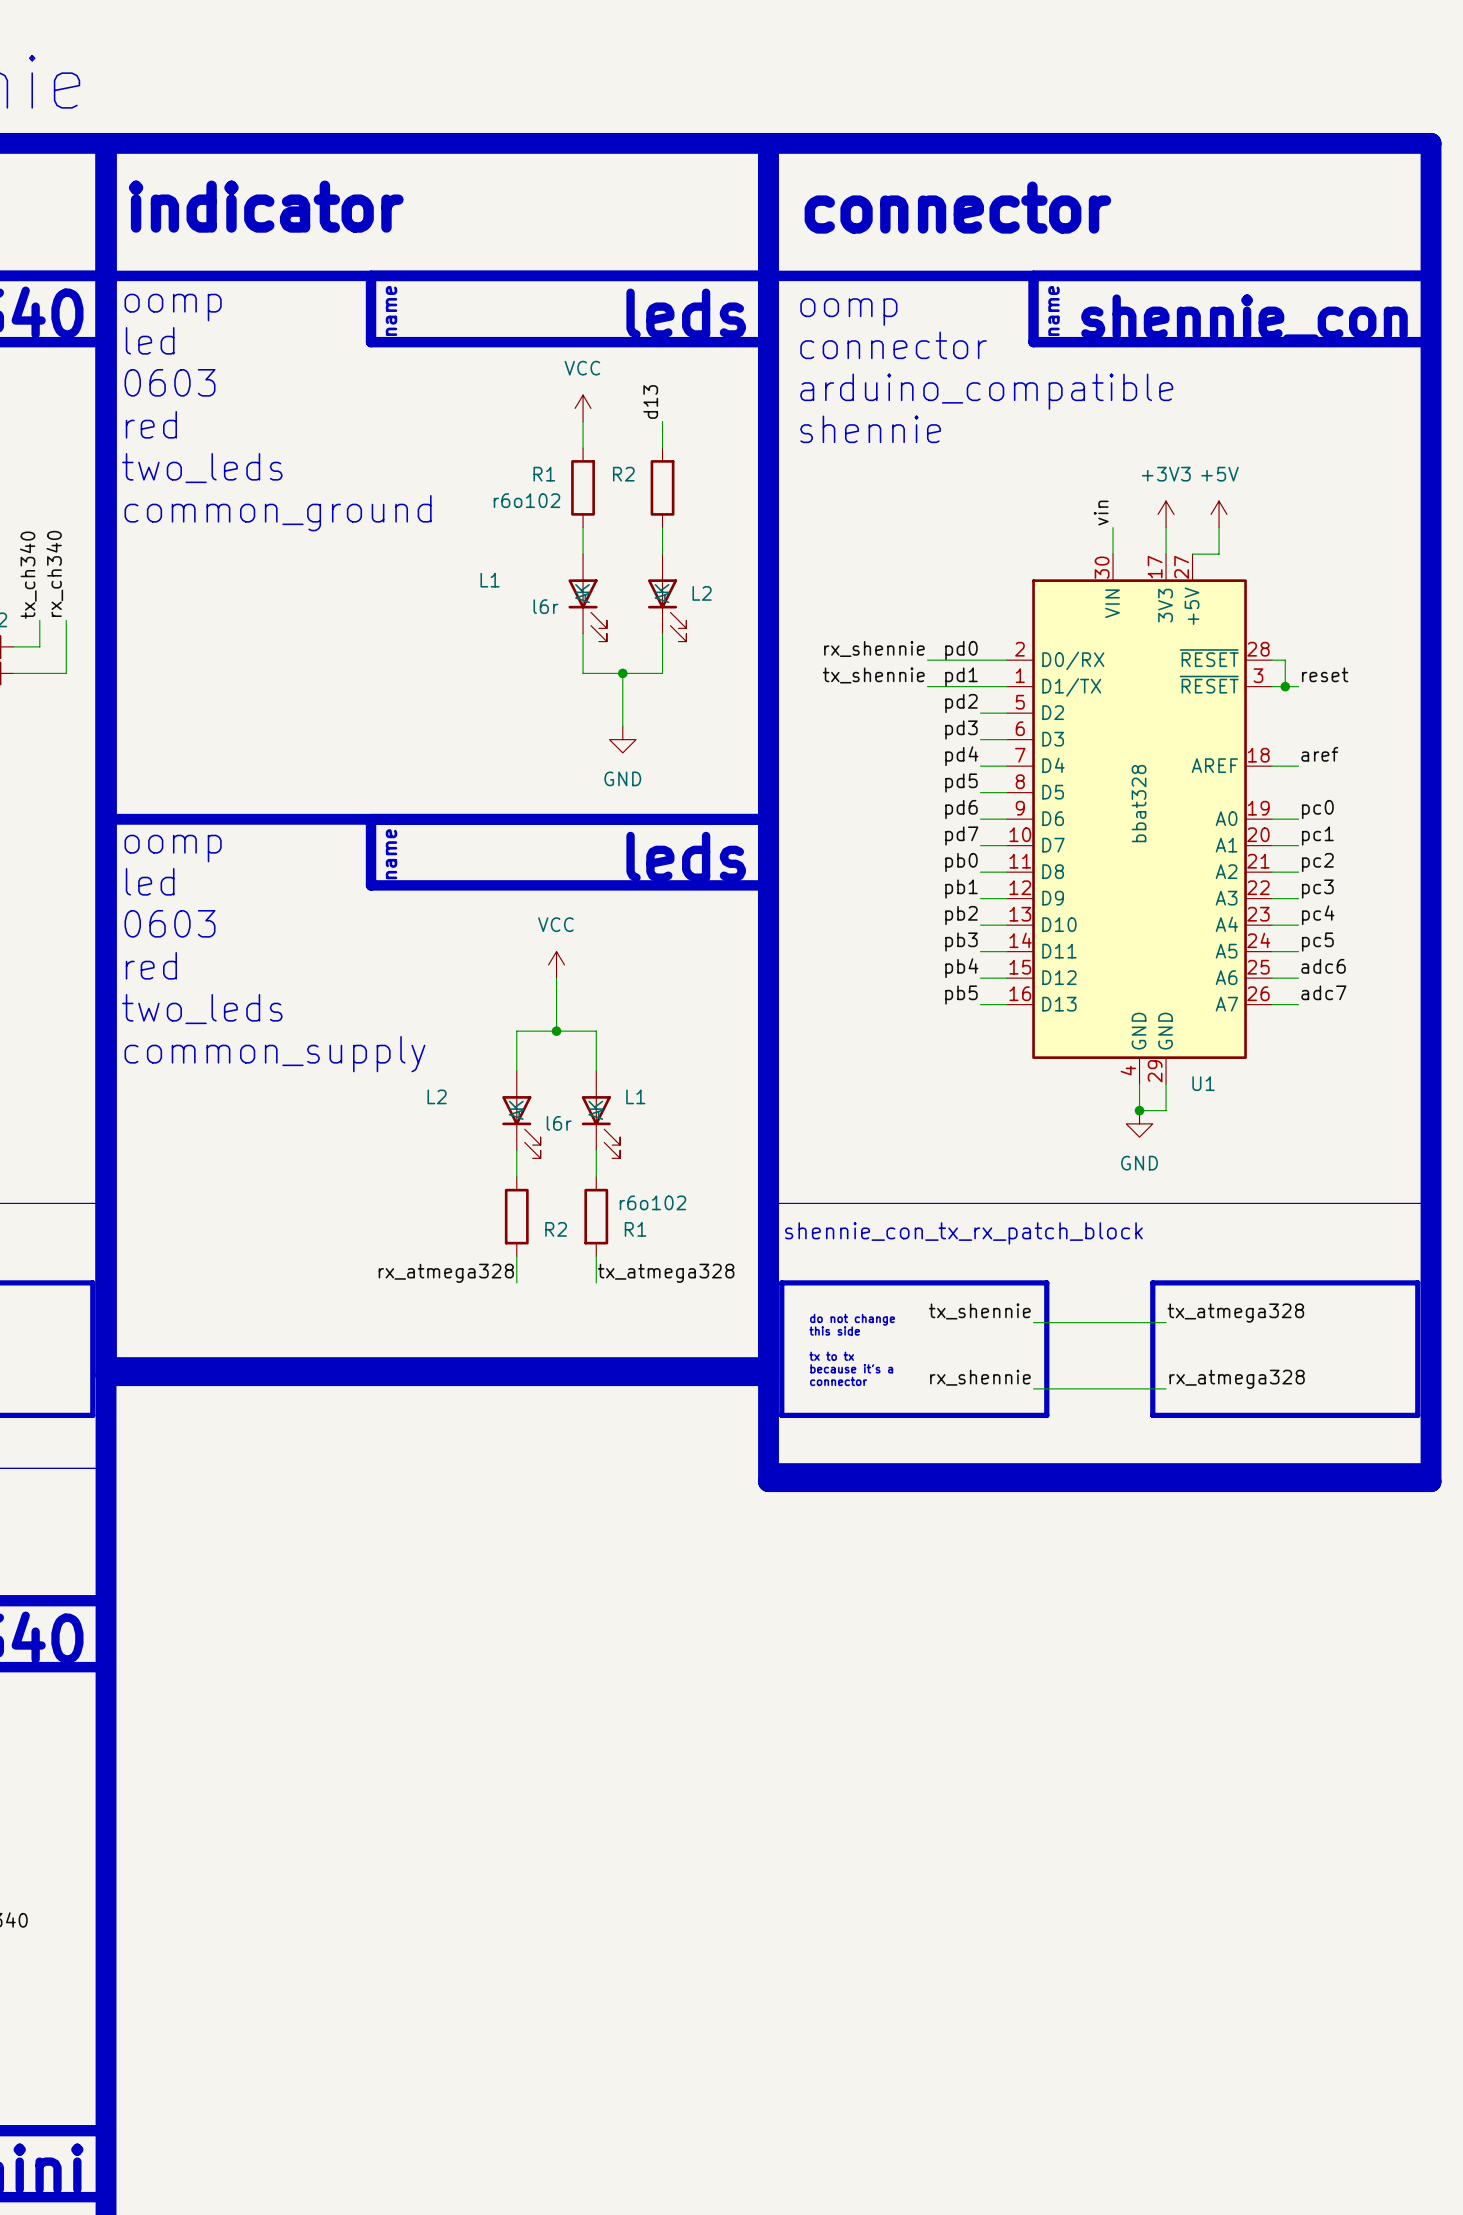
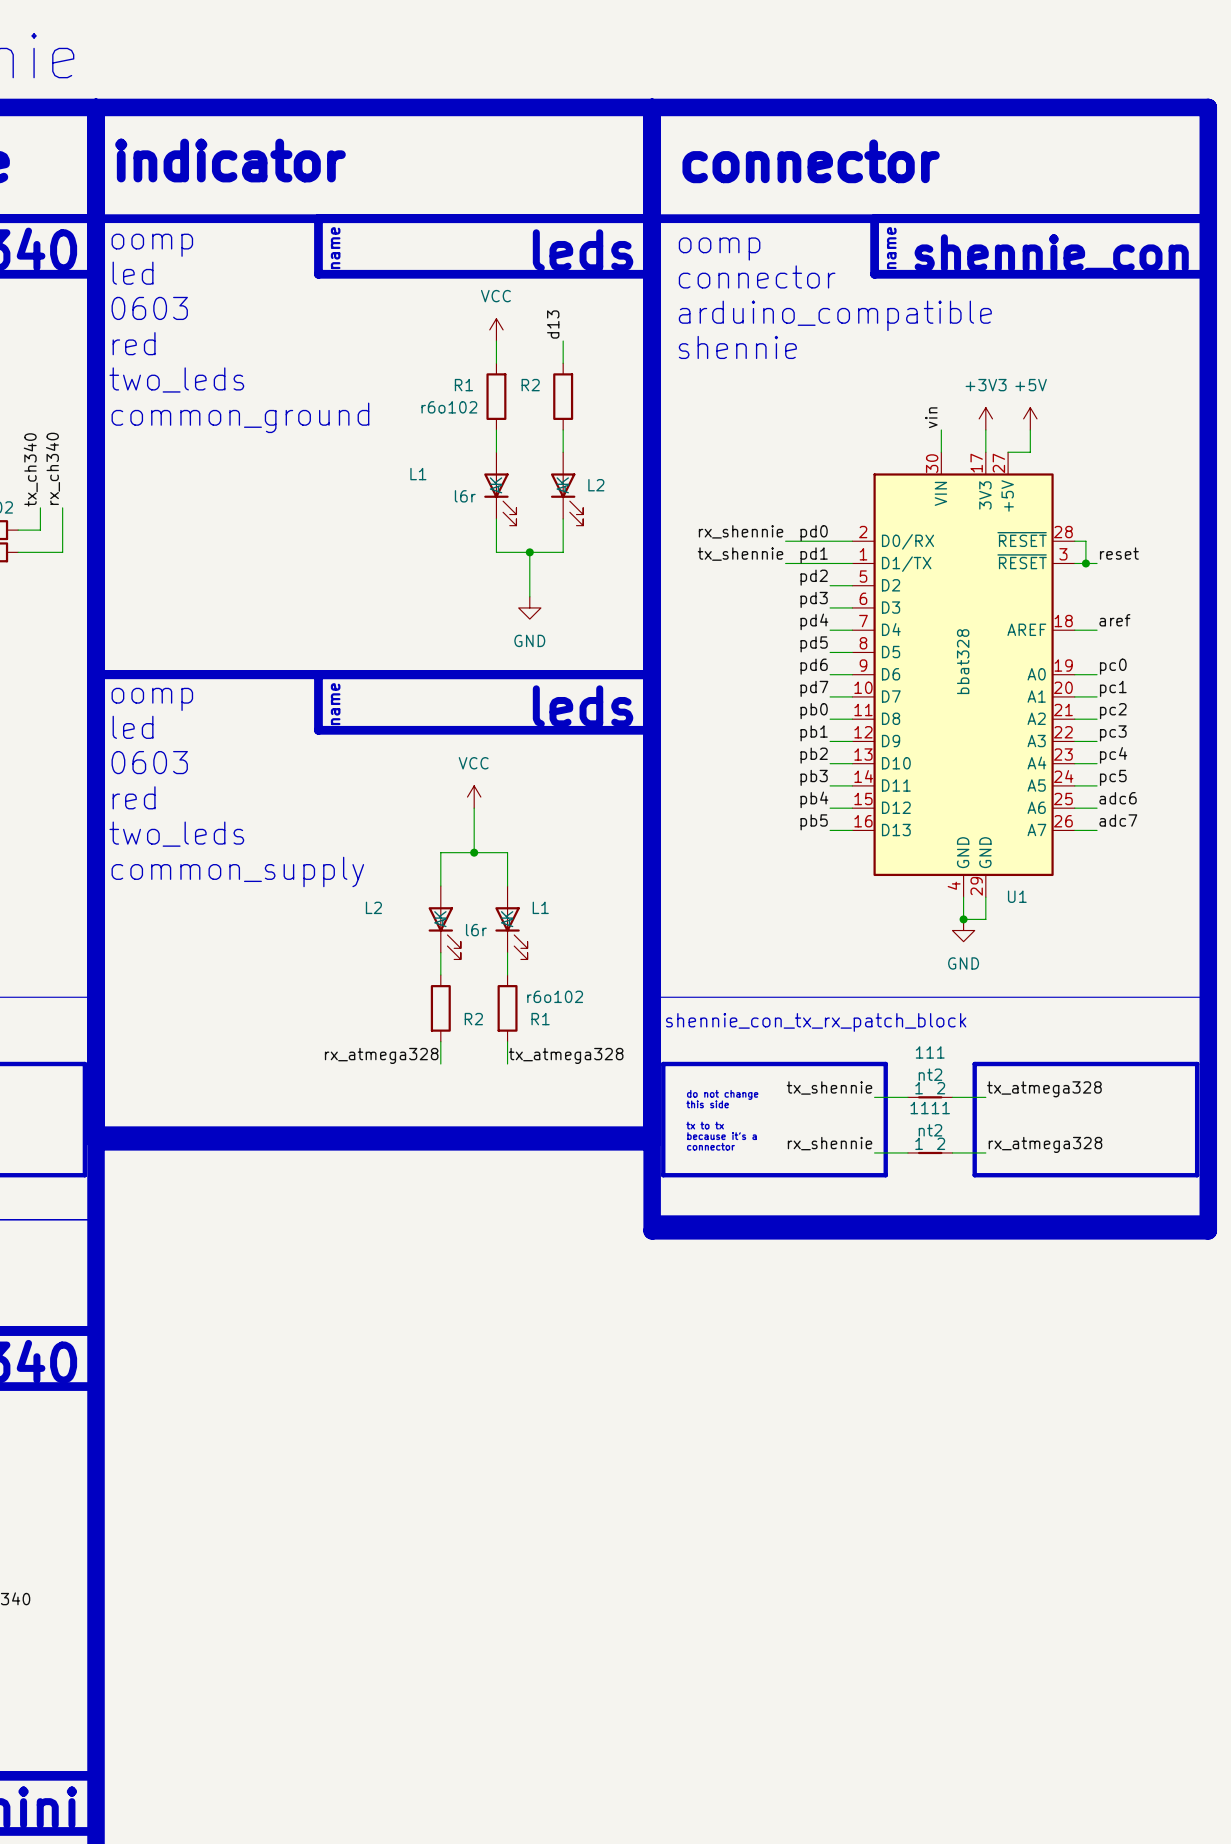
111: none -> nt2 (930, 1097)
1111: none -> nt2 (930, 1152)

